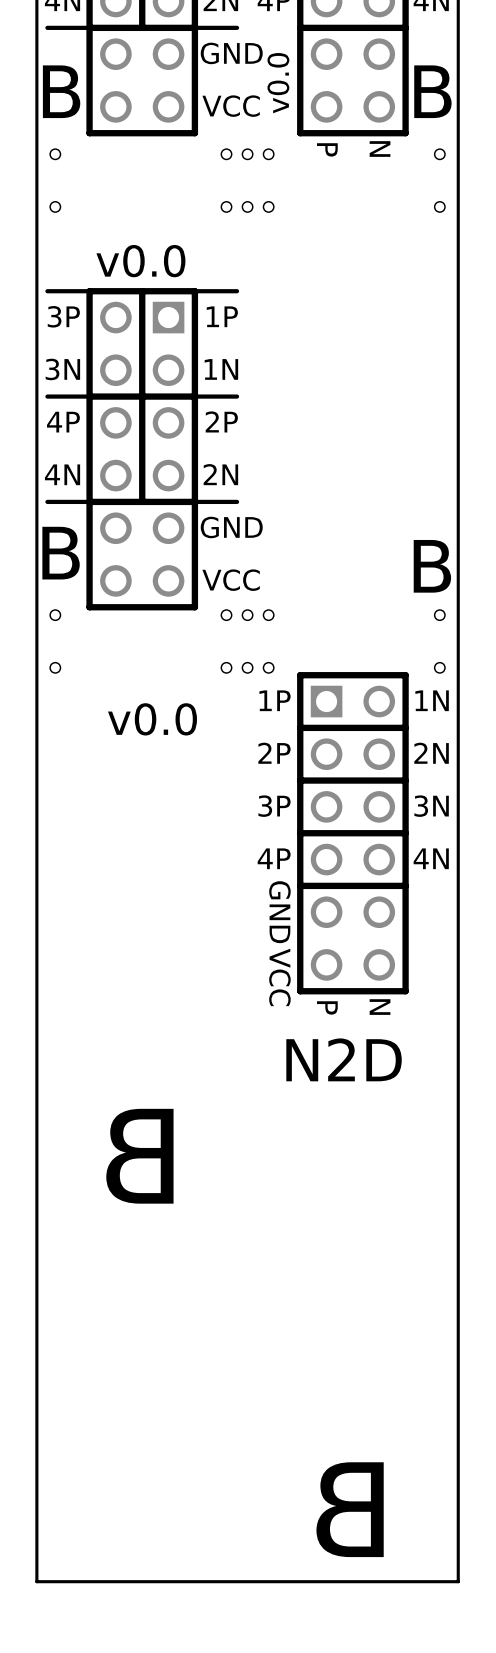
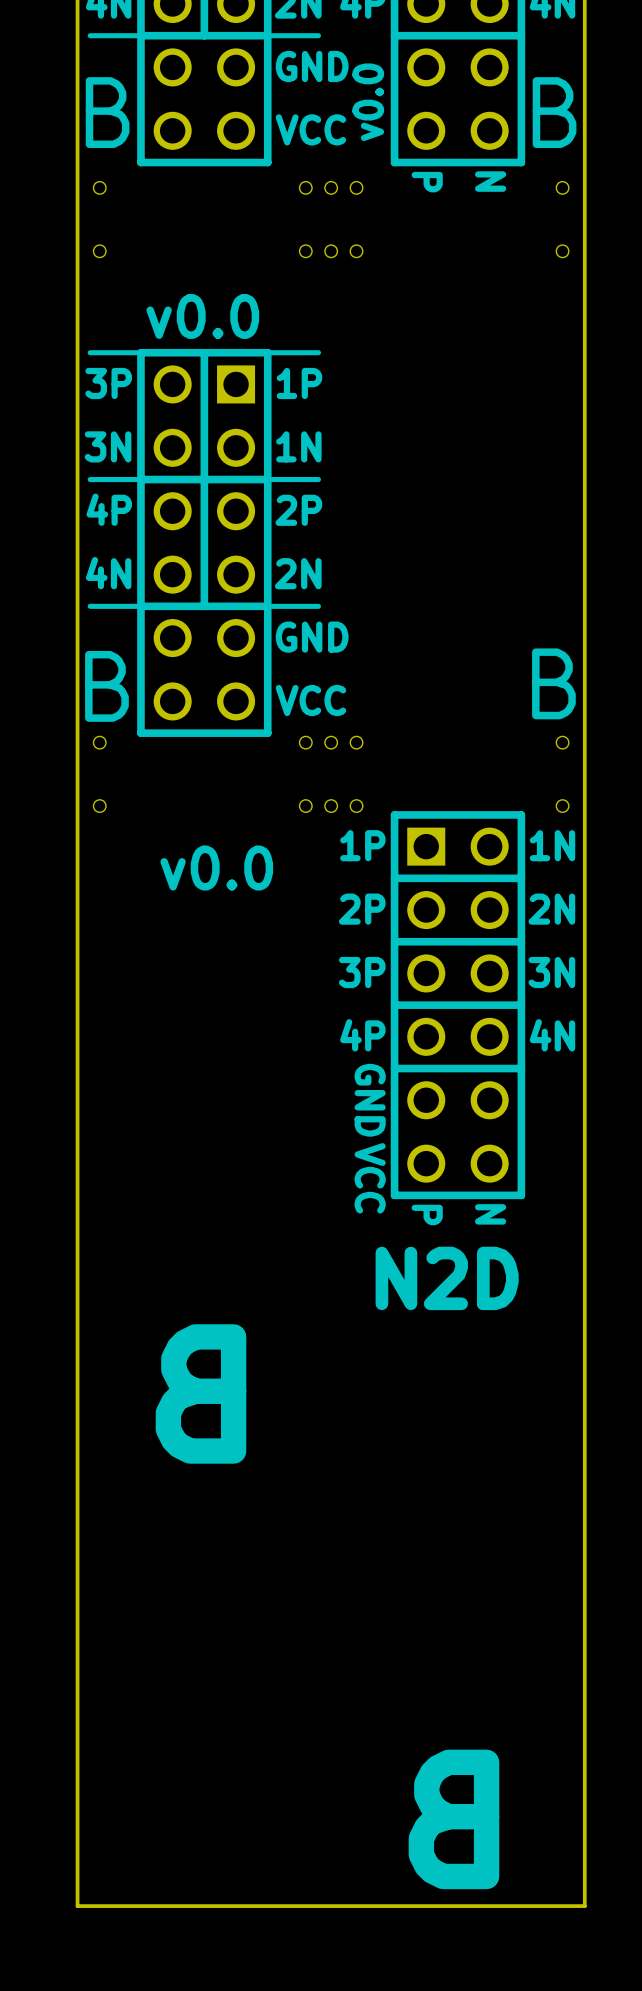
text position: B (61, 553) -> B (106, 686)

